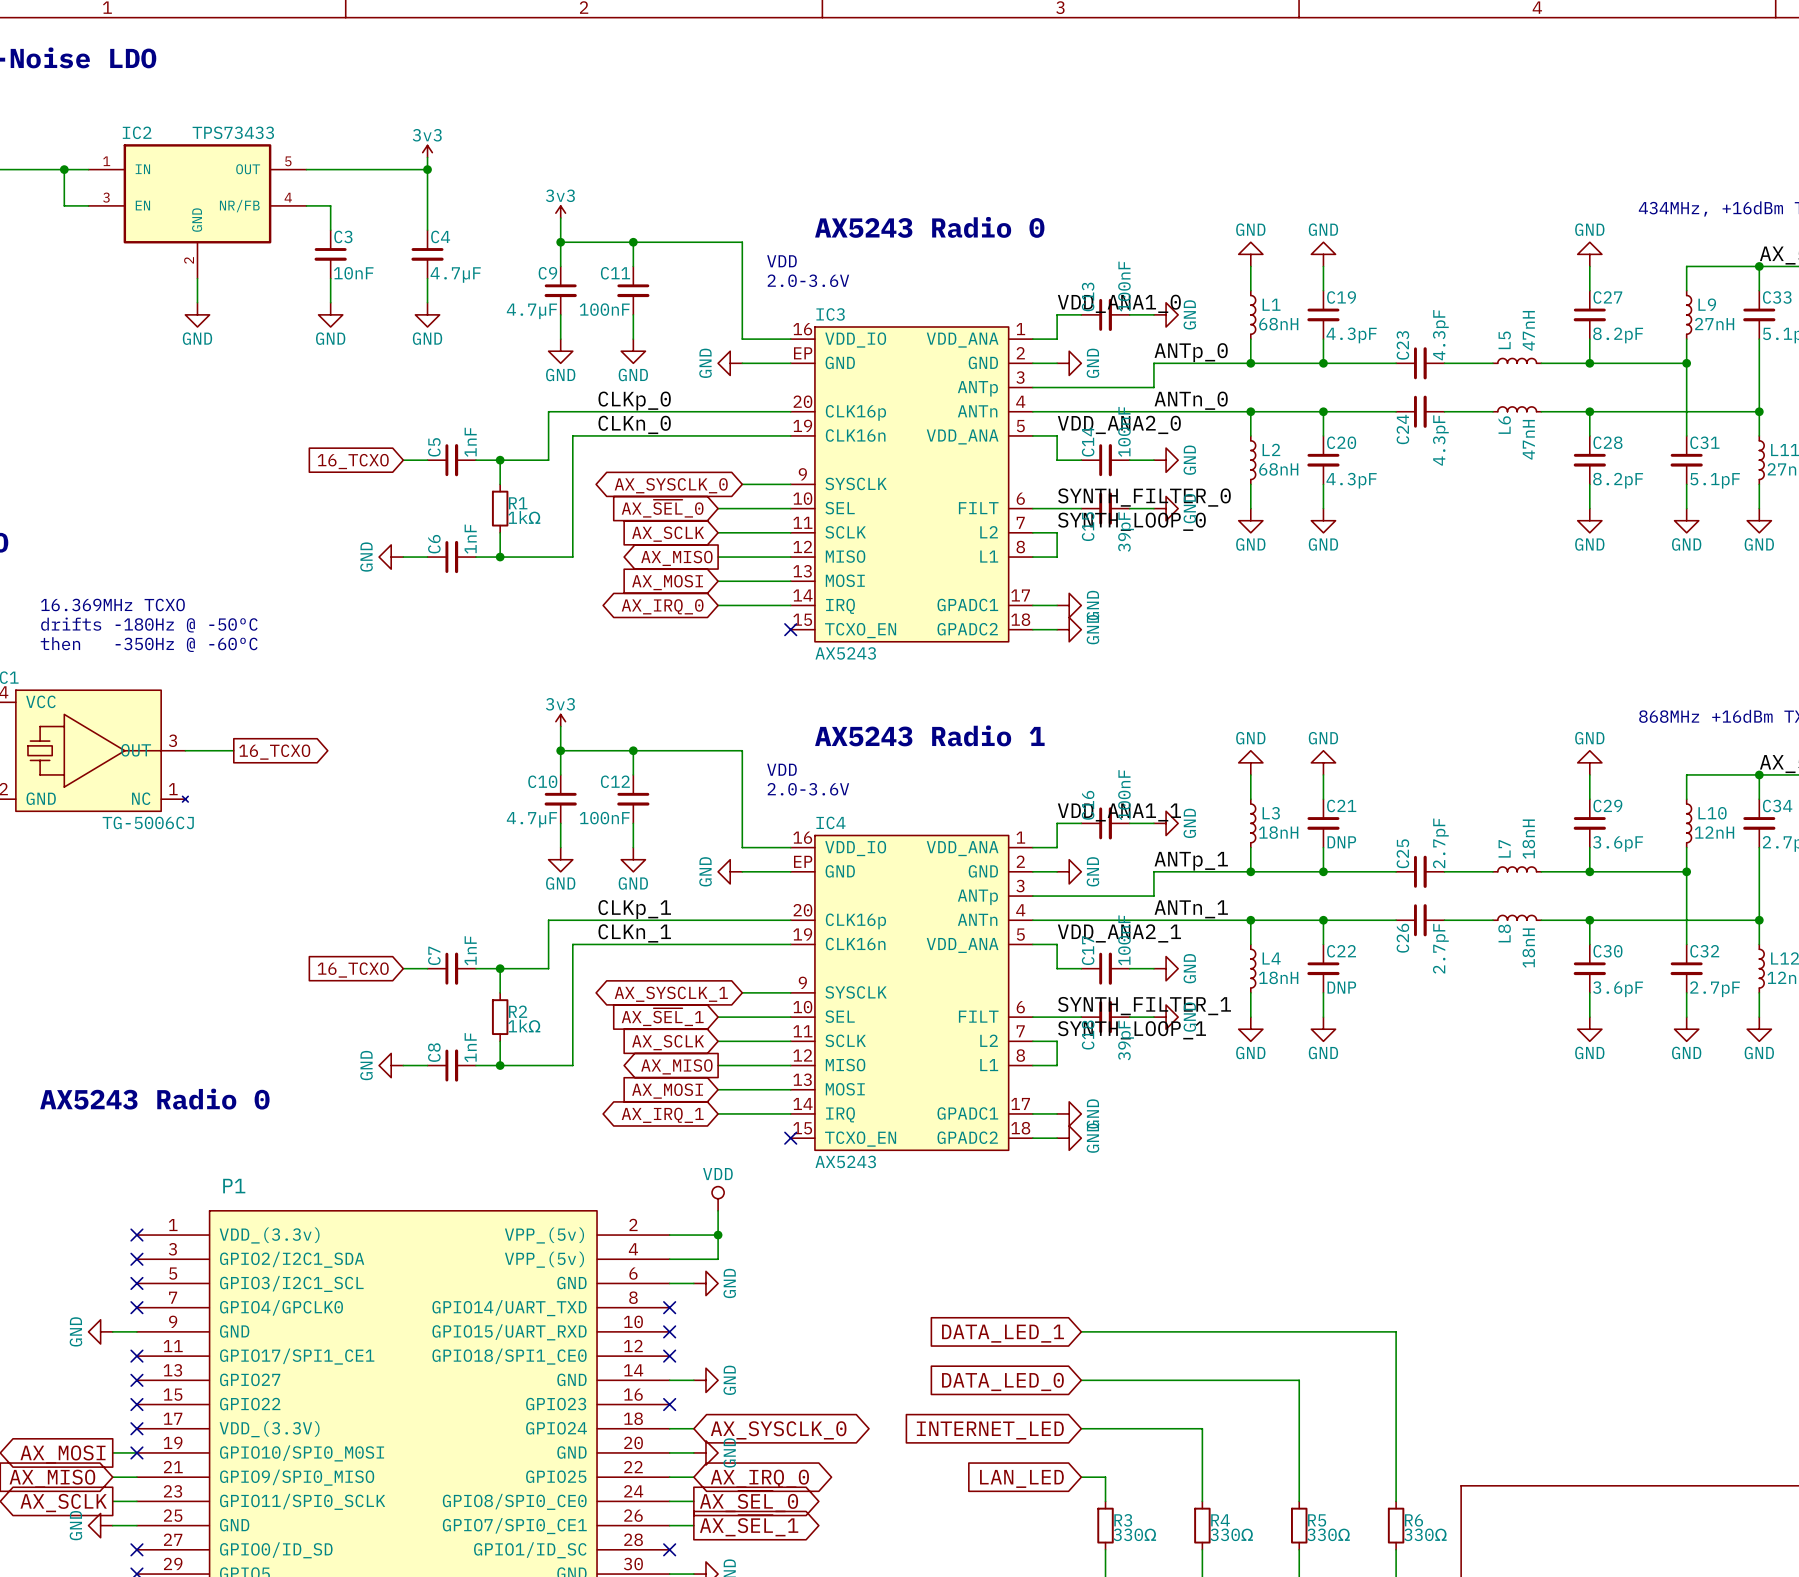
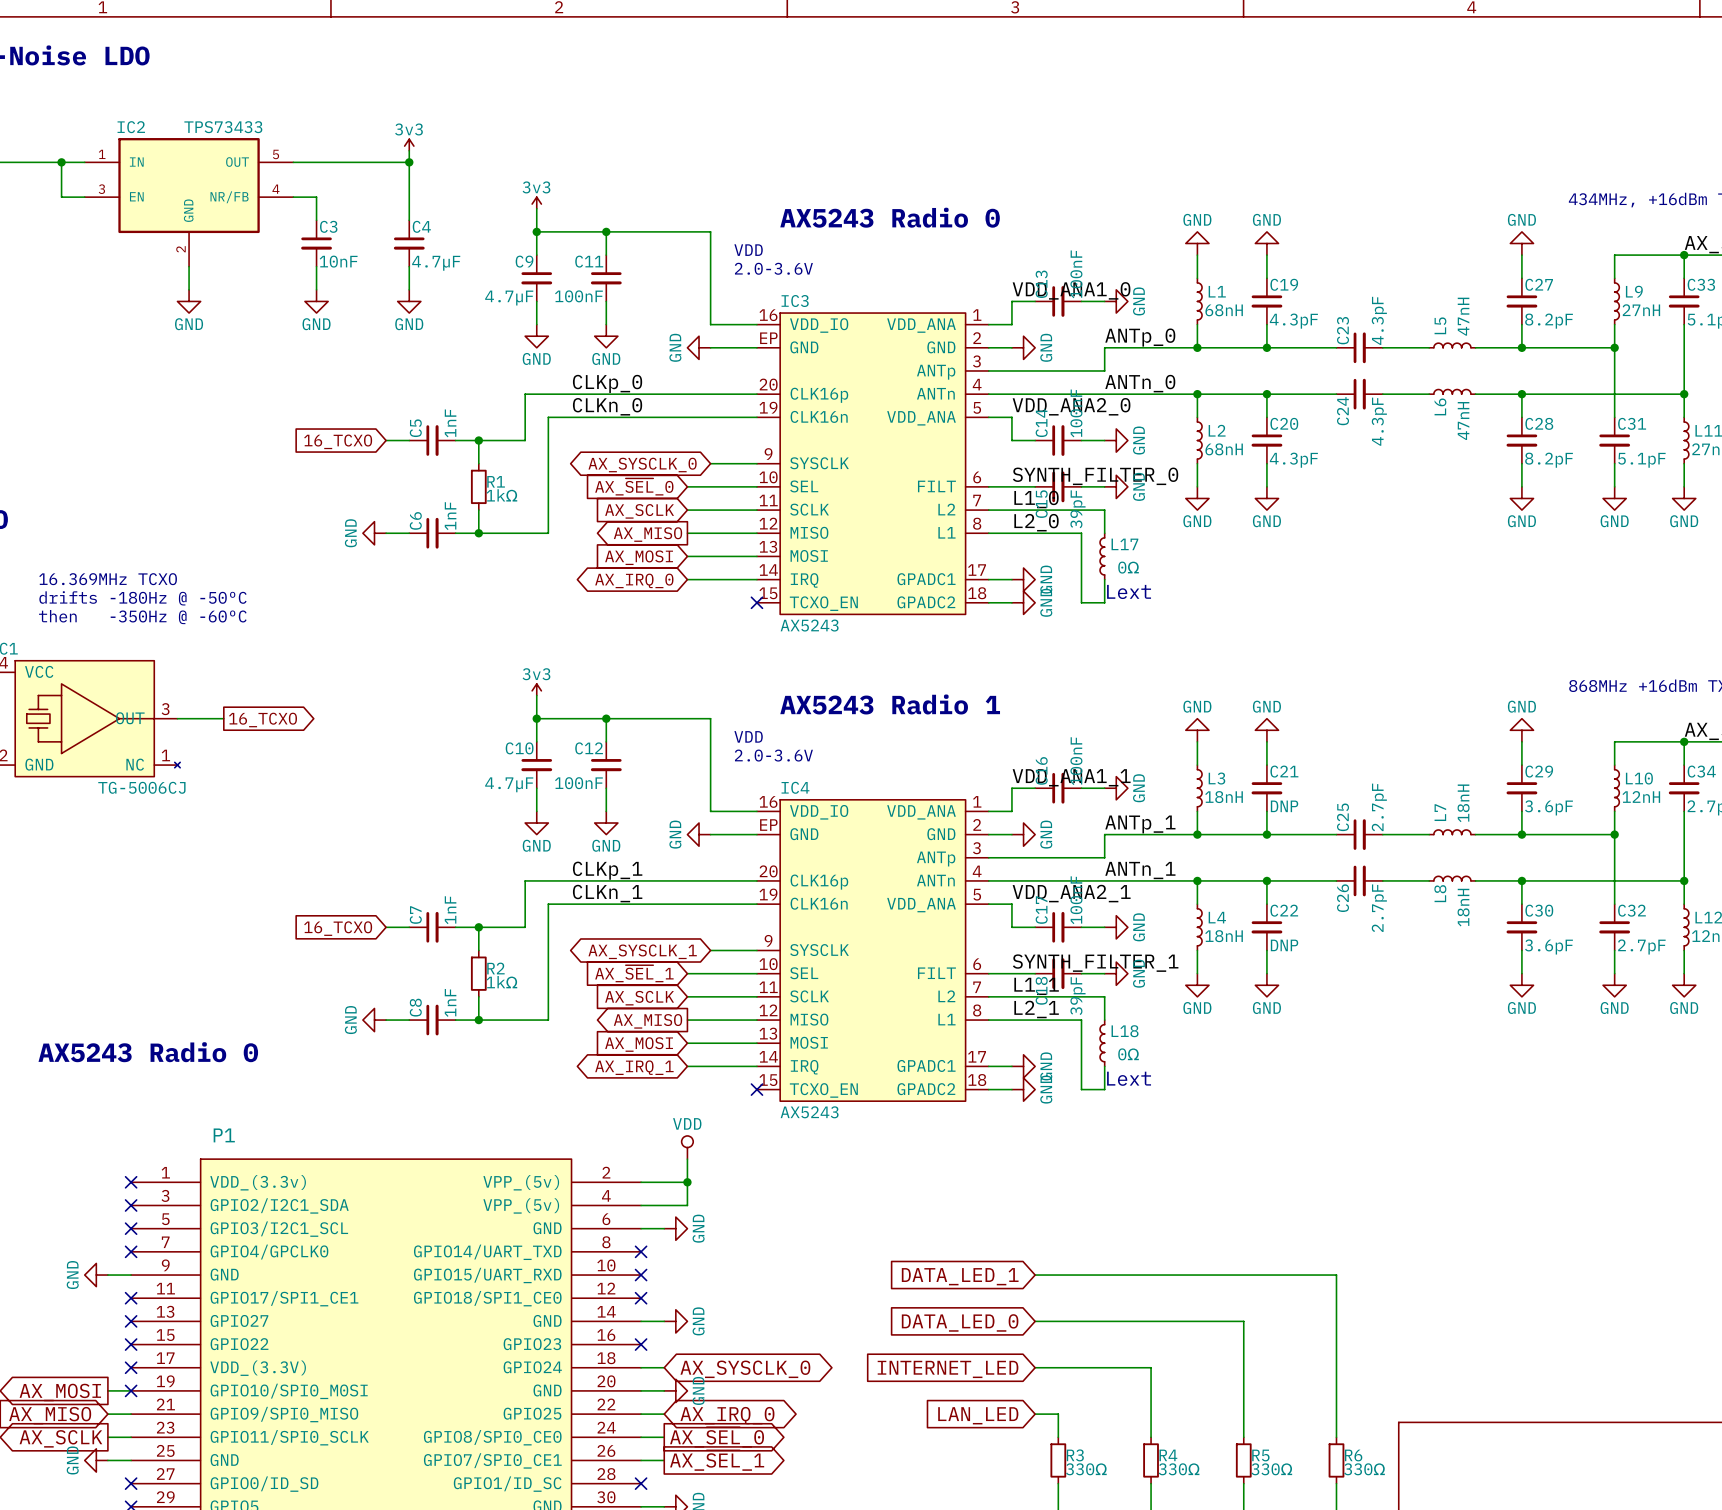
label: SYNTH_LOOP_0 (1131, 521) -> L1_0 (1036, 499)
wire: (1057, 532) (1057, 557) -> (1011, 510) (1104, 510) (1104, 533)
label: none -> L2_0 (1036, 522)
wire: none -> (1011, 533) (1081, 533) (1081, 602) (1104, 602) (1104, 579)
L17: none -> 0Ω (1102, 556)
text: none -> Lext (1129, 591)
label: SYNTH_LOOP_1 (1132, 1030) -> L1_1 (1036, 986)
wire: (1057, 1041) (1057, 1065) -> (1011, 996) (1104, 996) (1104, 1020)
label: none -> L2_1 (1036, 1009)
wire: none -> (1011, 1020) (1081, 1020) (1081, 1089) (1104, 1089) (1104, 1066)
L18: none -> 0Ω (1102, 1043)
text: none -> Lext (1129, 1078)

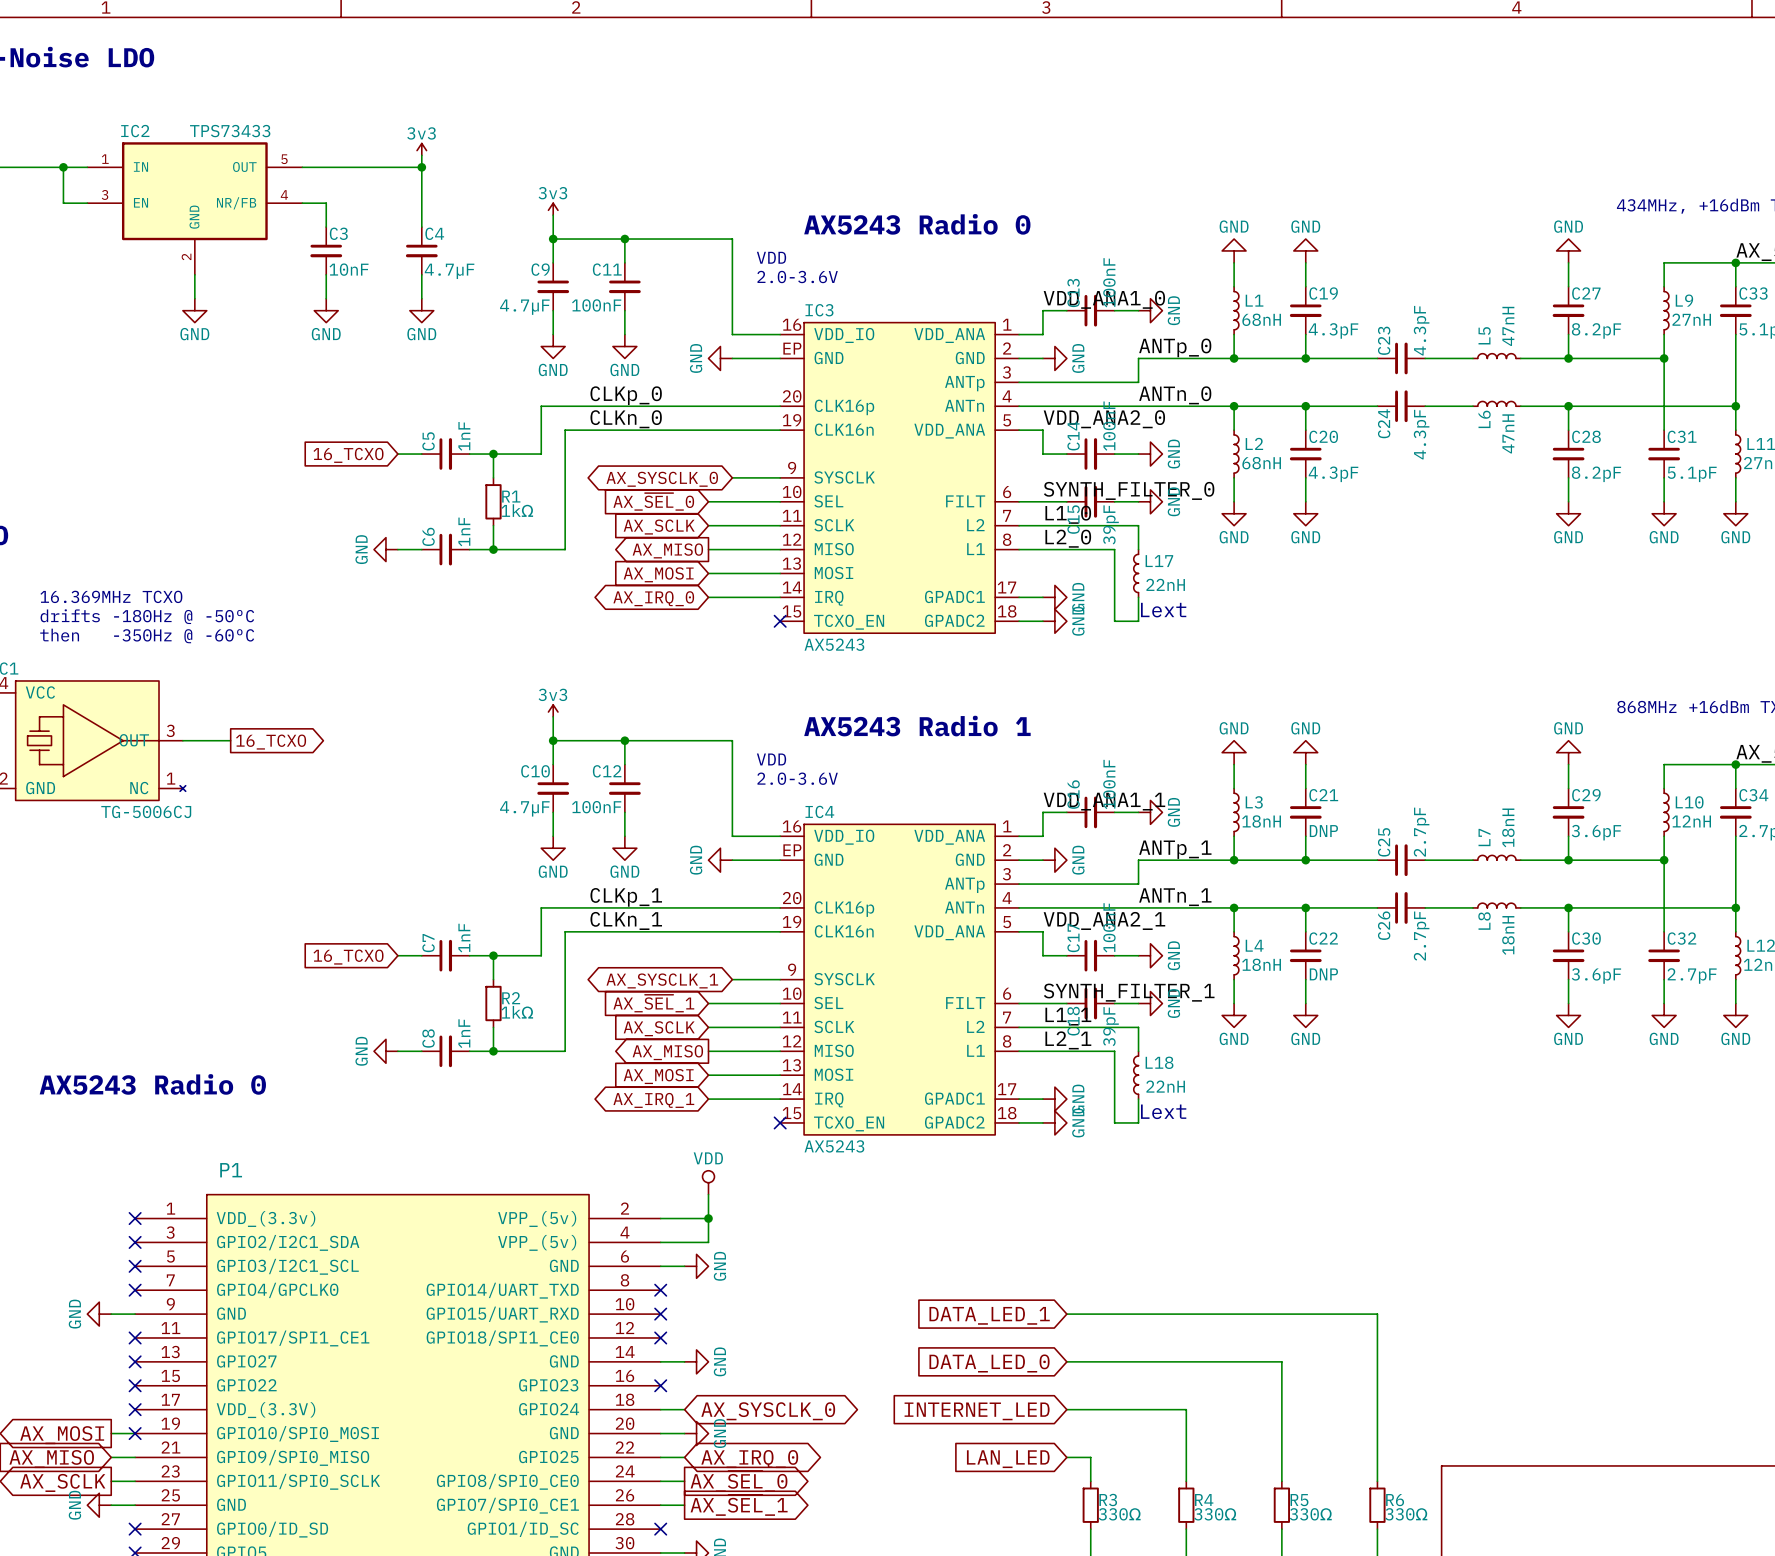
L17 value: 0Ω (1128, 567) -> 22nH (1165, 584)
L18 value: 0Ω (1128, 1054) -> 22nH (1165, 1086)

